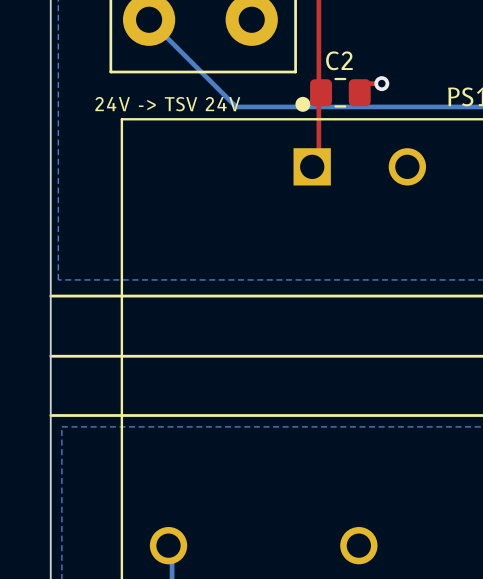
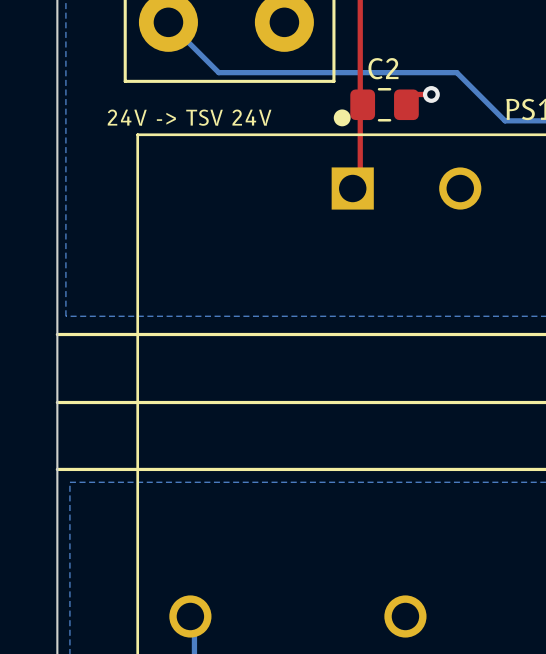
bottom track: (193, 64) (236, 106) (447, 106) -> (218, 72) (456, 72) (505, 120)

